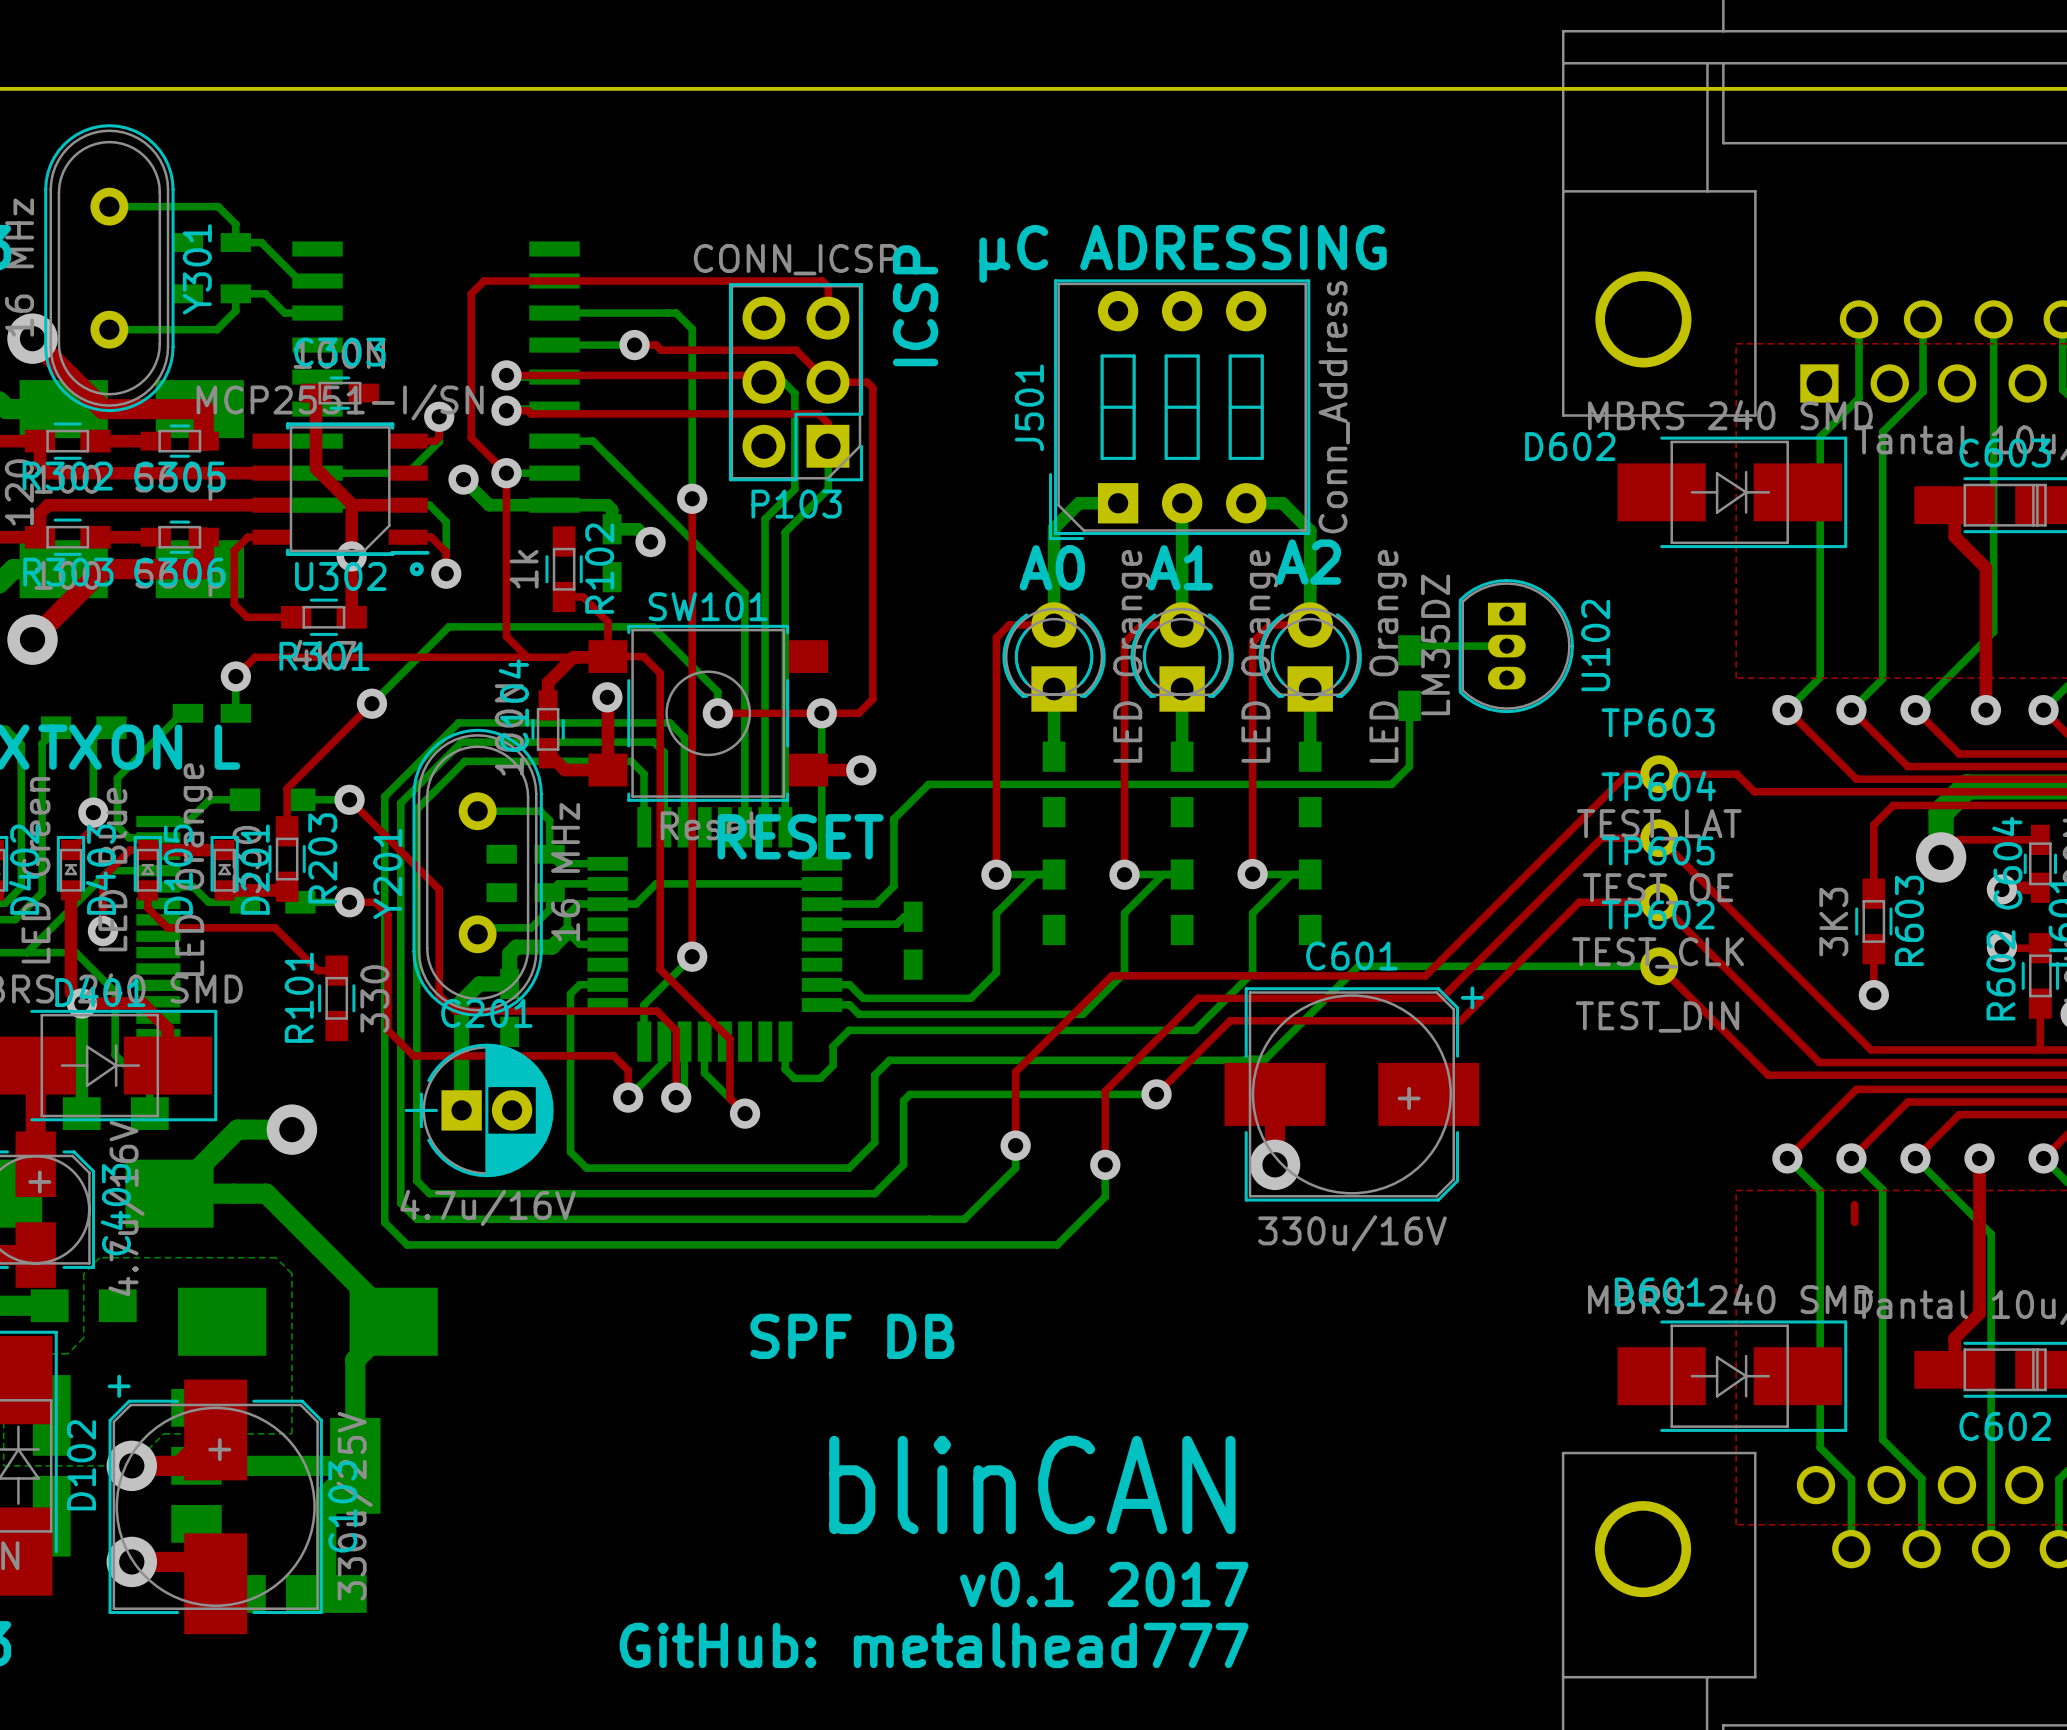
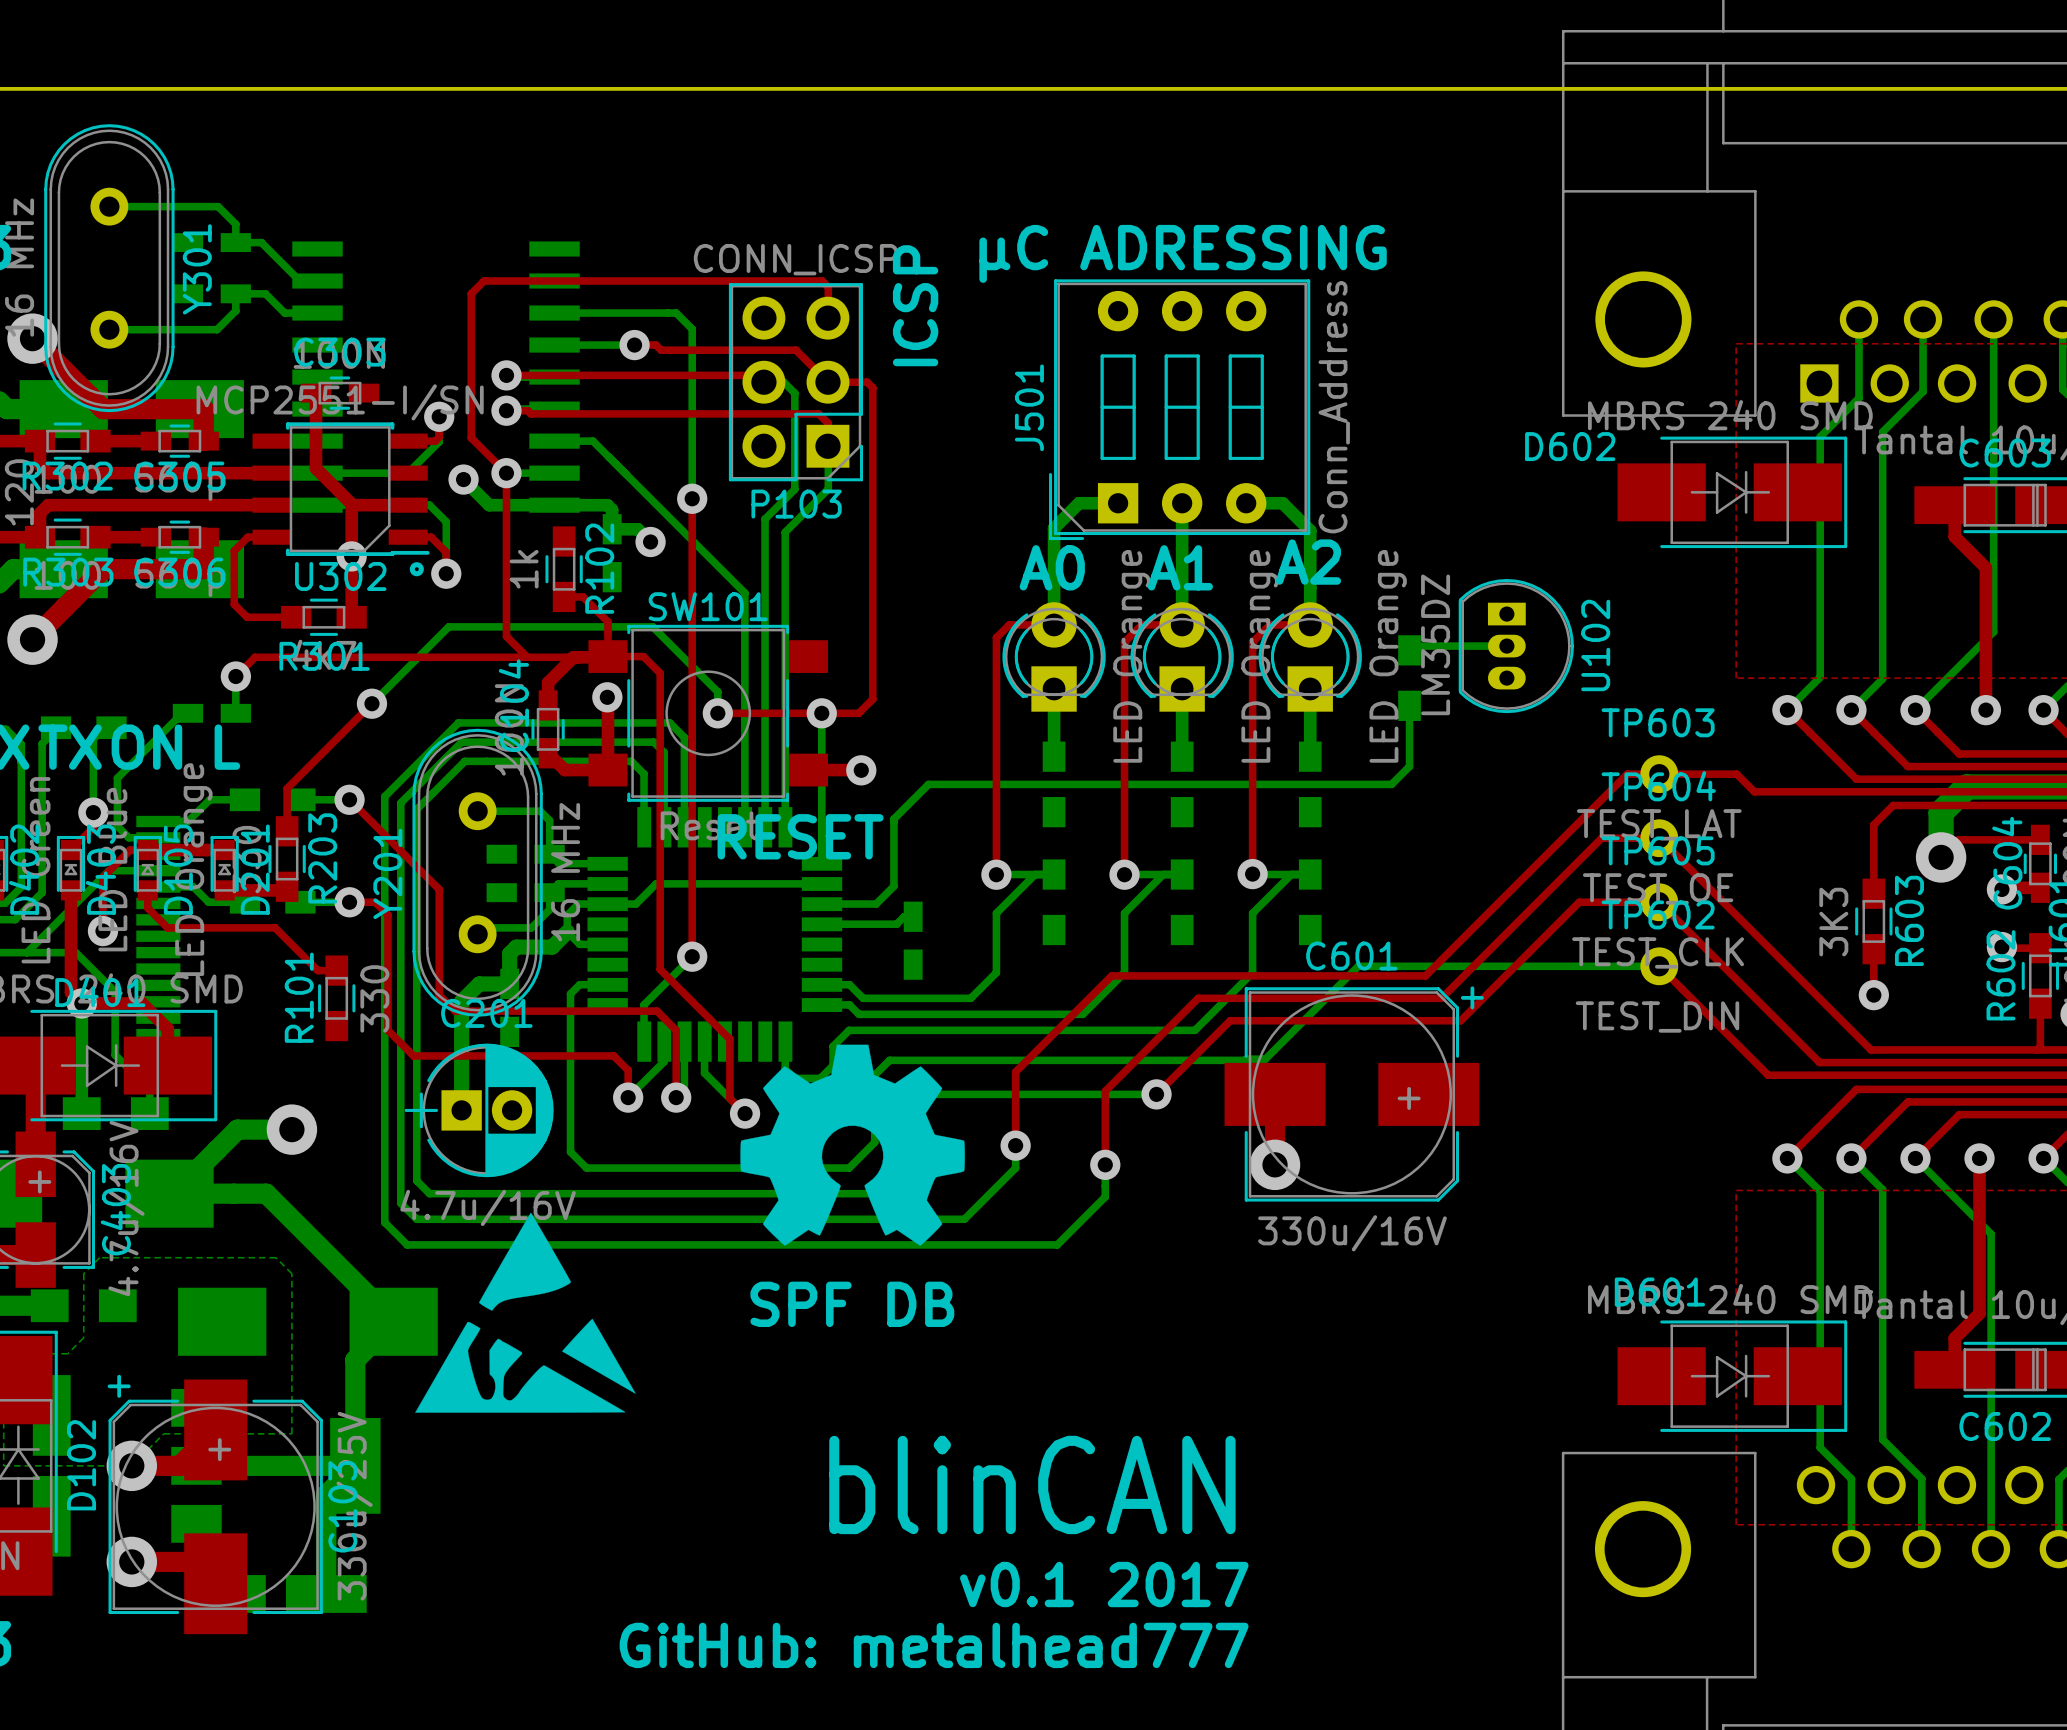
drawing: none -> [740, 1044, 965, 1246]
top track: (1854, 1204) (1854, 1222) -> none
drawing: none -> [415, 1212, 636, 1413]
text position: SPF DB (852, 1336) -> SPF DB (852, 1304)

